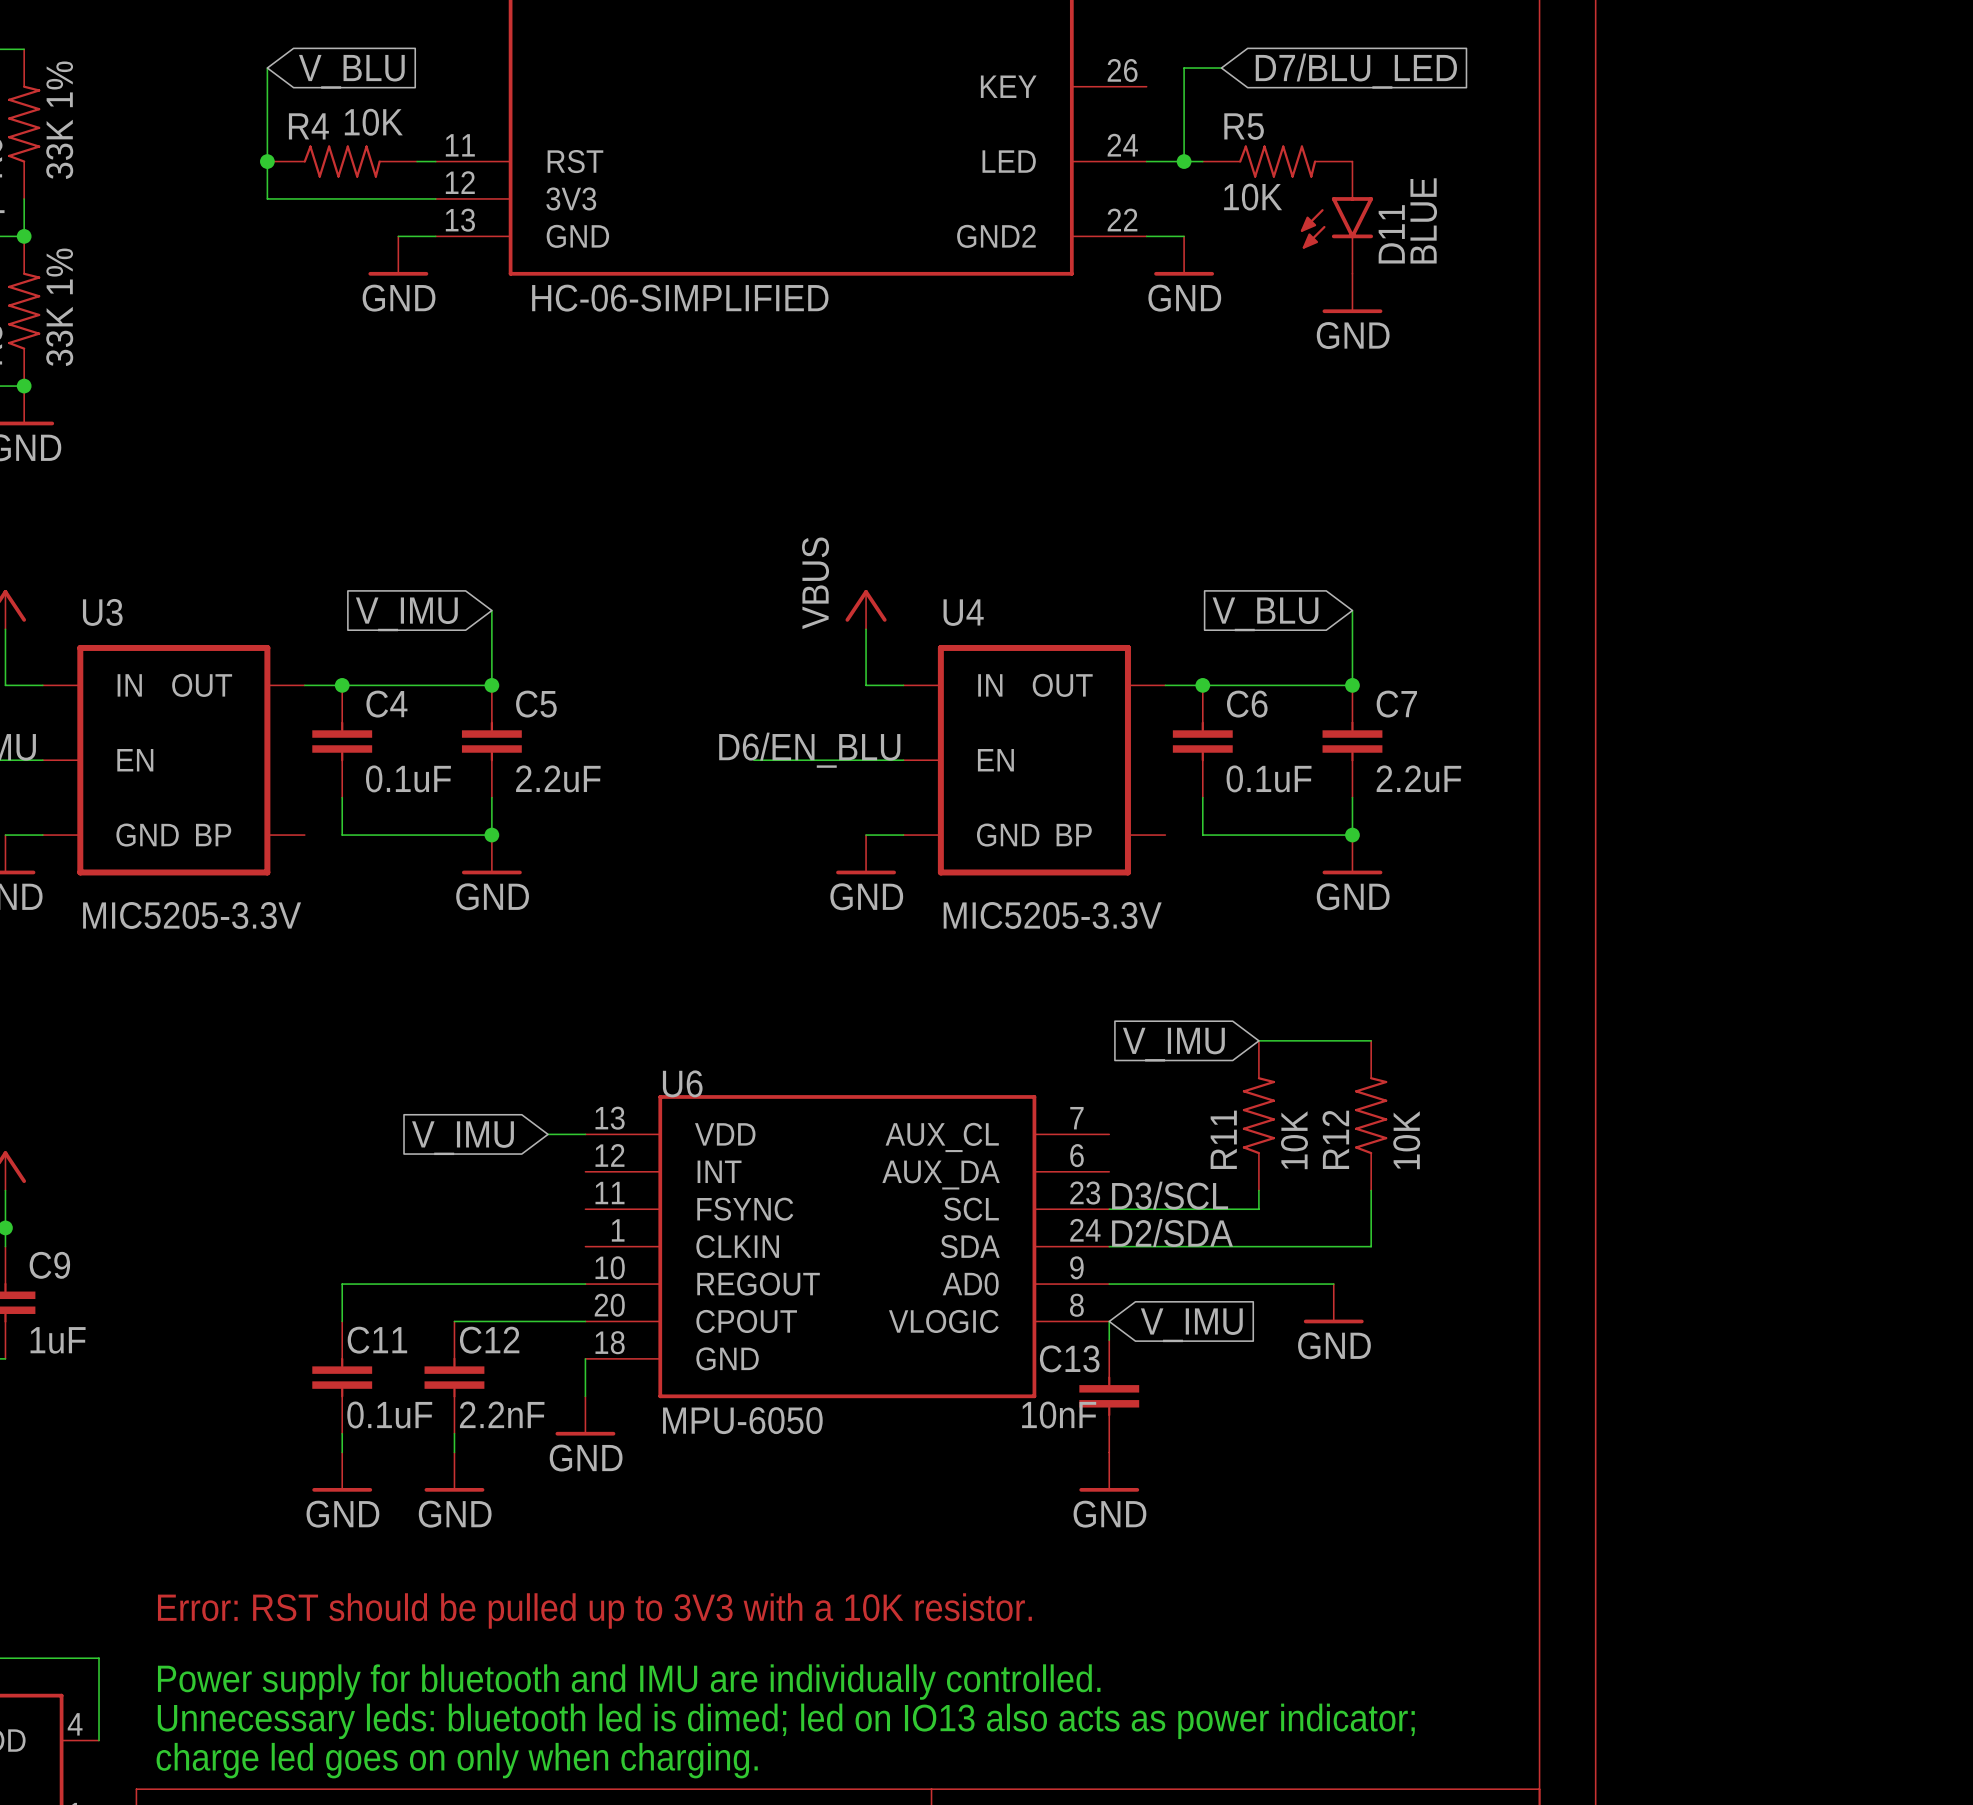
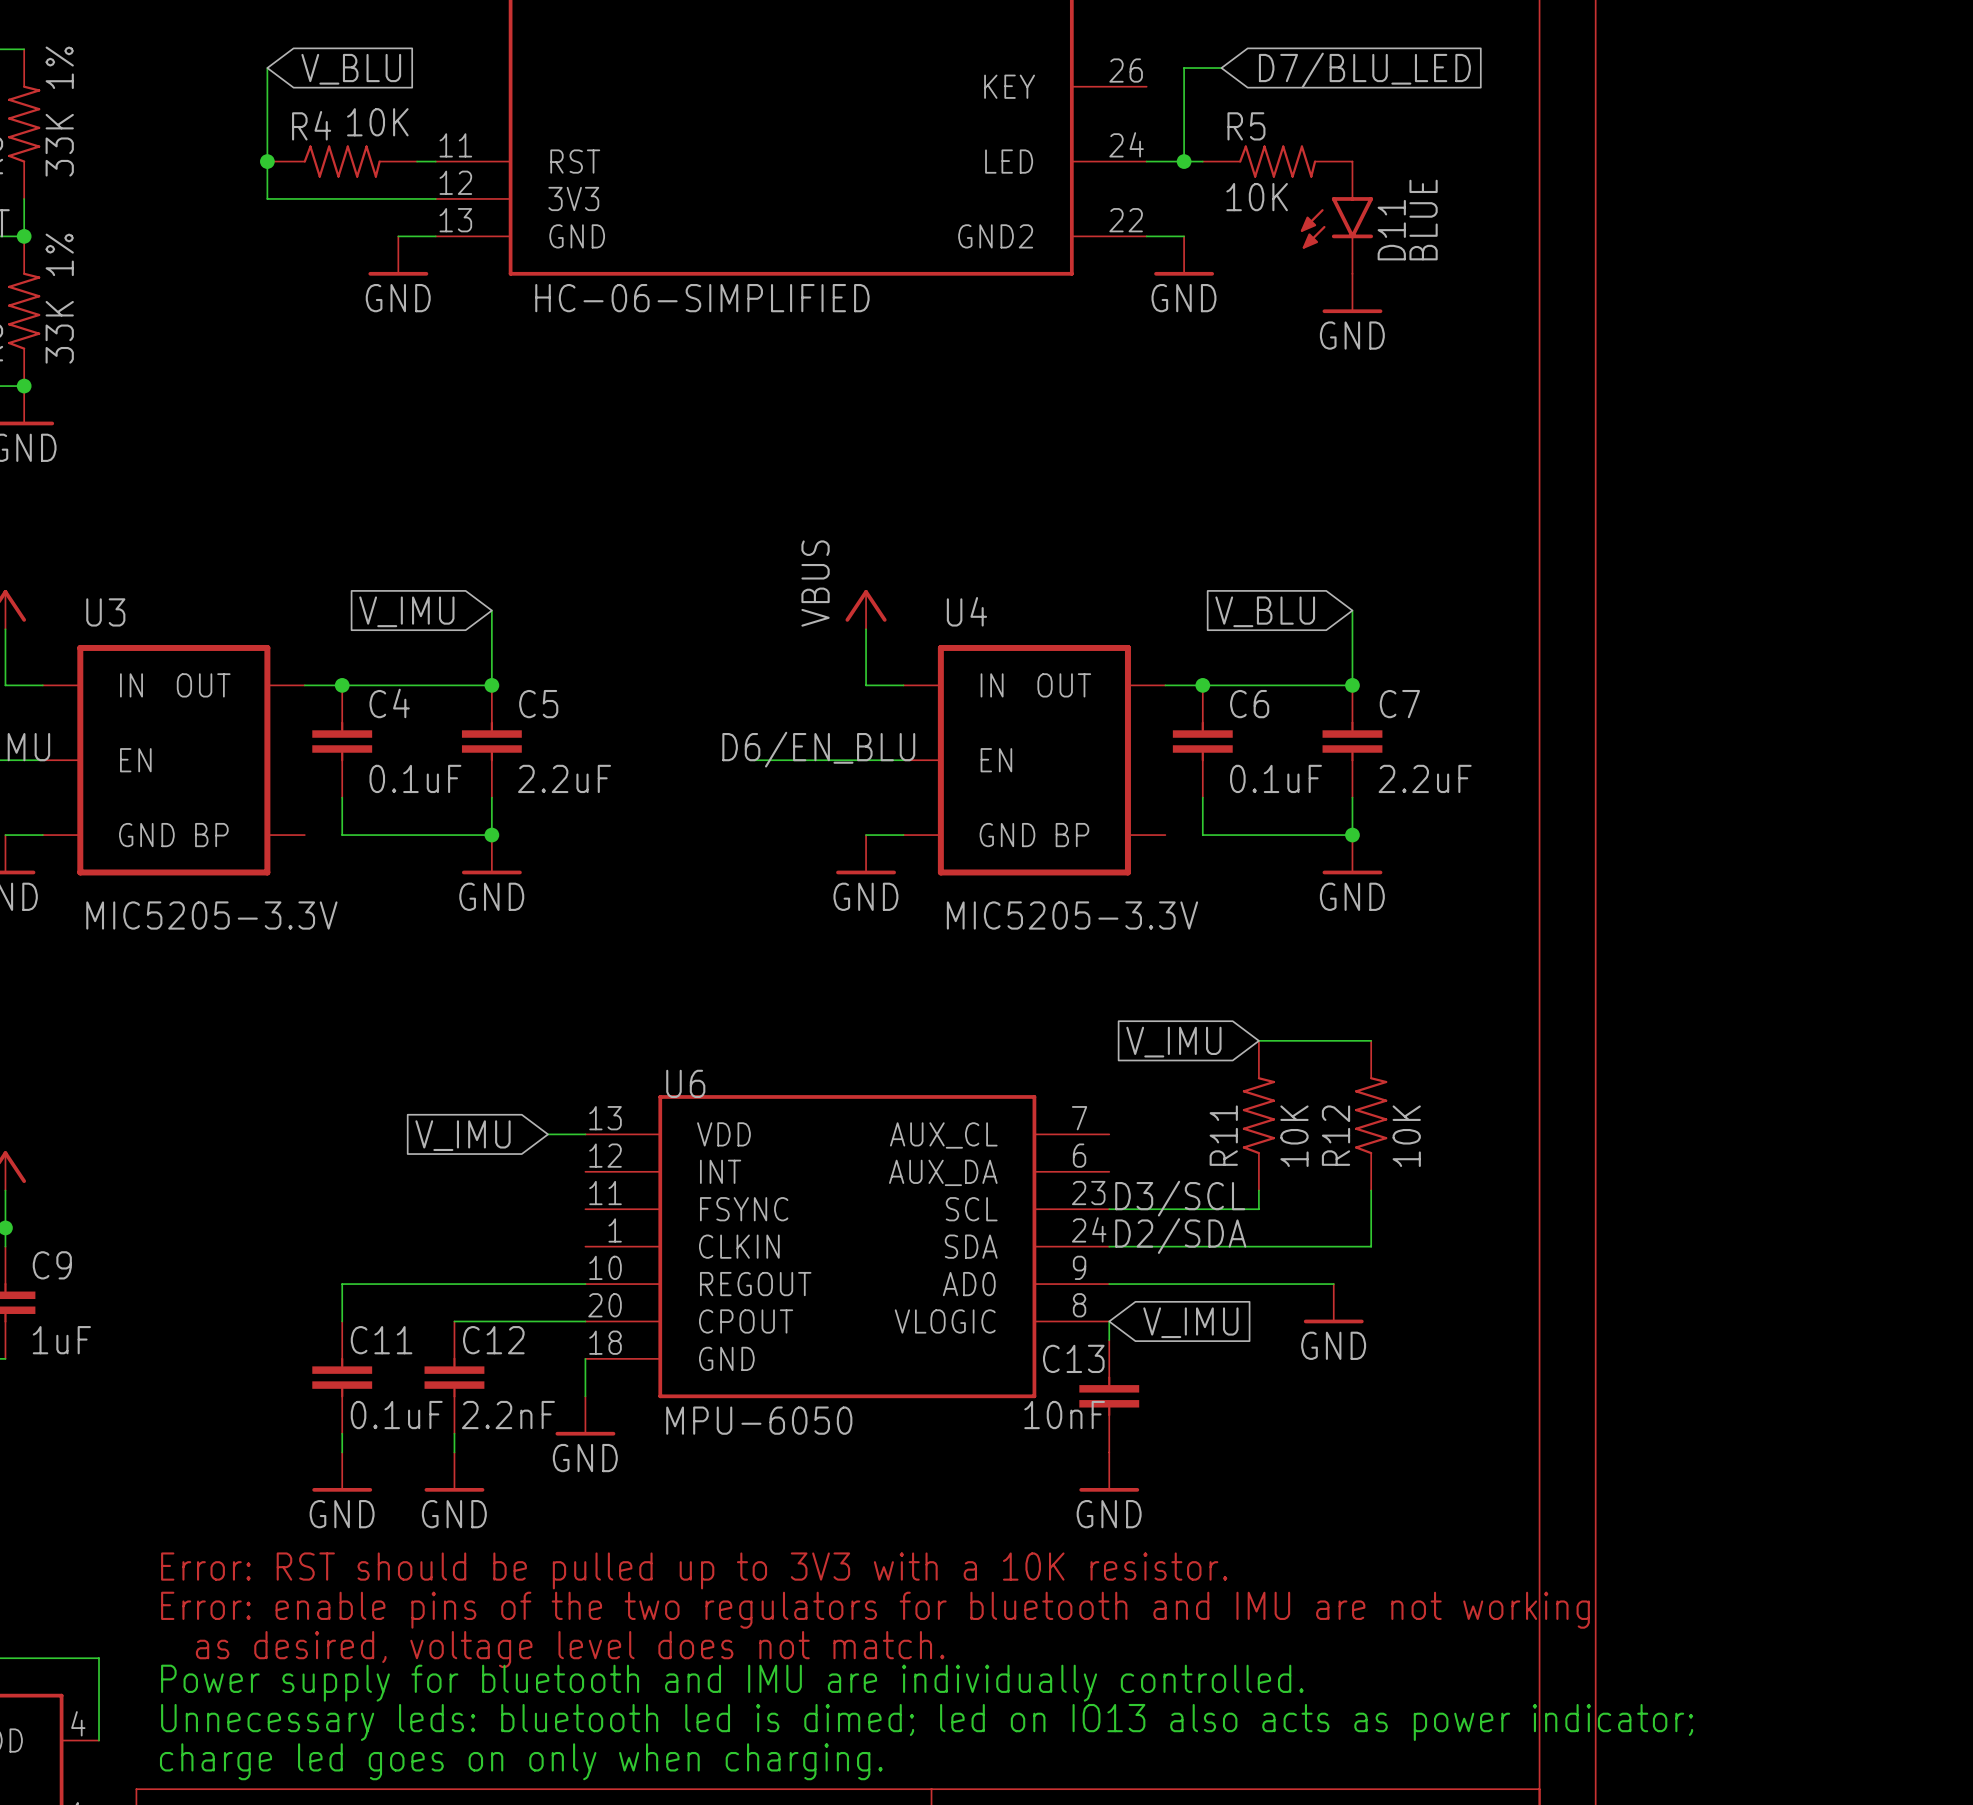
text: none -> Error: enable pins of the two regulators for bluetooth and IMU are not working (875, 1610)
text position: Error: RST should be pulled up to 3V3 with a 10K resistor. (594, 1610) -> Error: RST should be pulled up to 3V3 with a 10K resistor. (694, 1570)
text: none -> as desired, voltage level does not match. (570, 1649)

